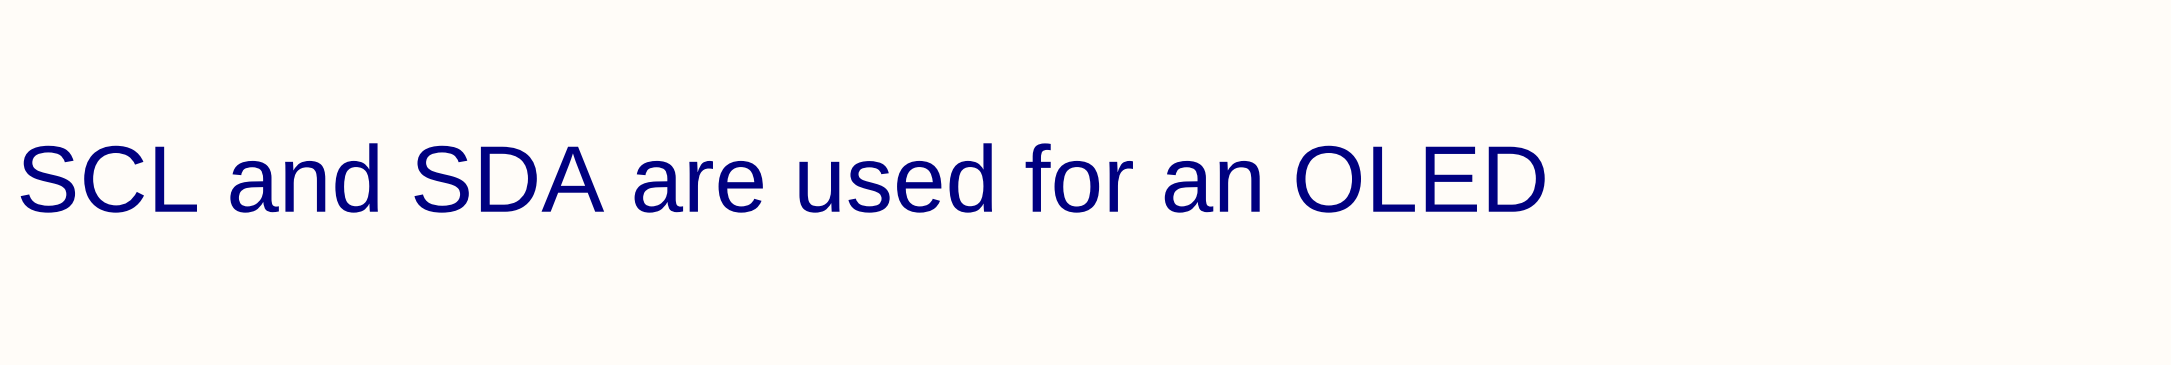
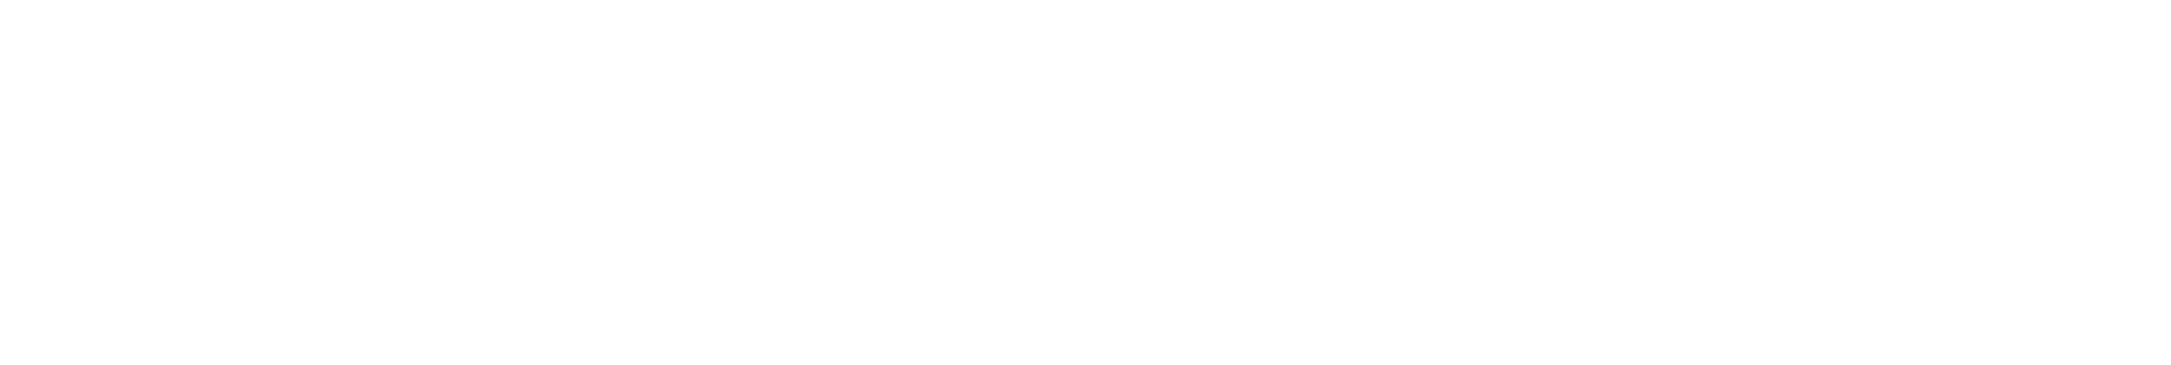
text: SCL and SDA are used for an OLED (782, 177) -> none

